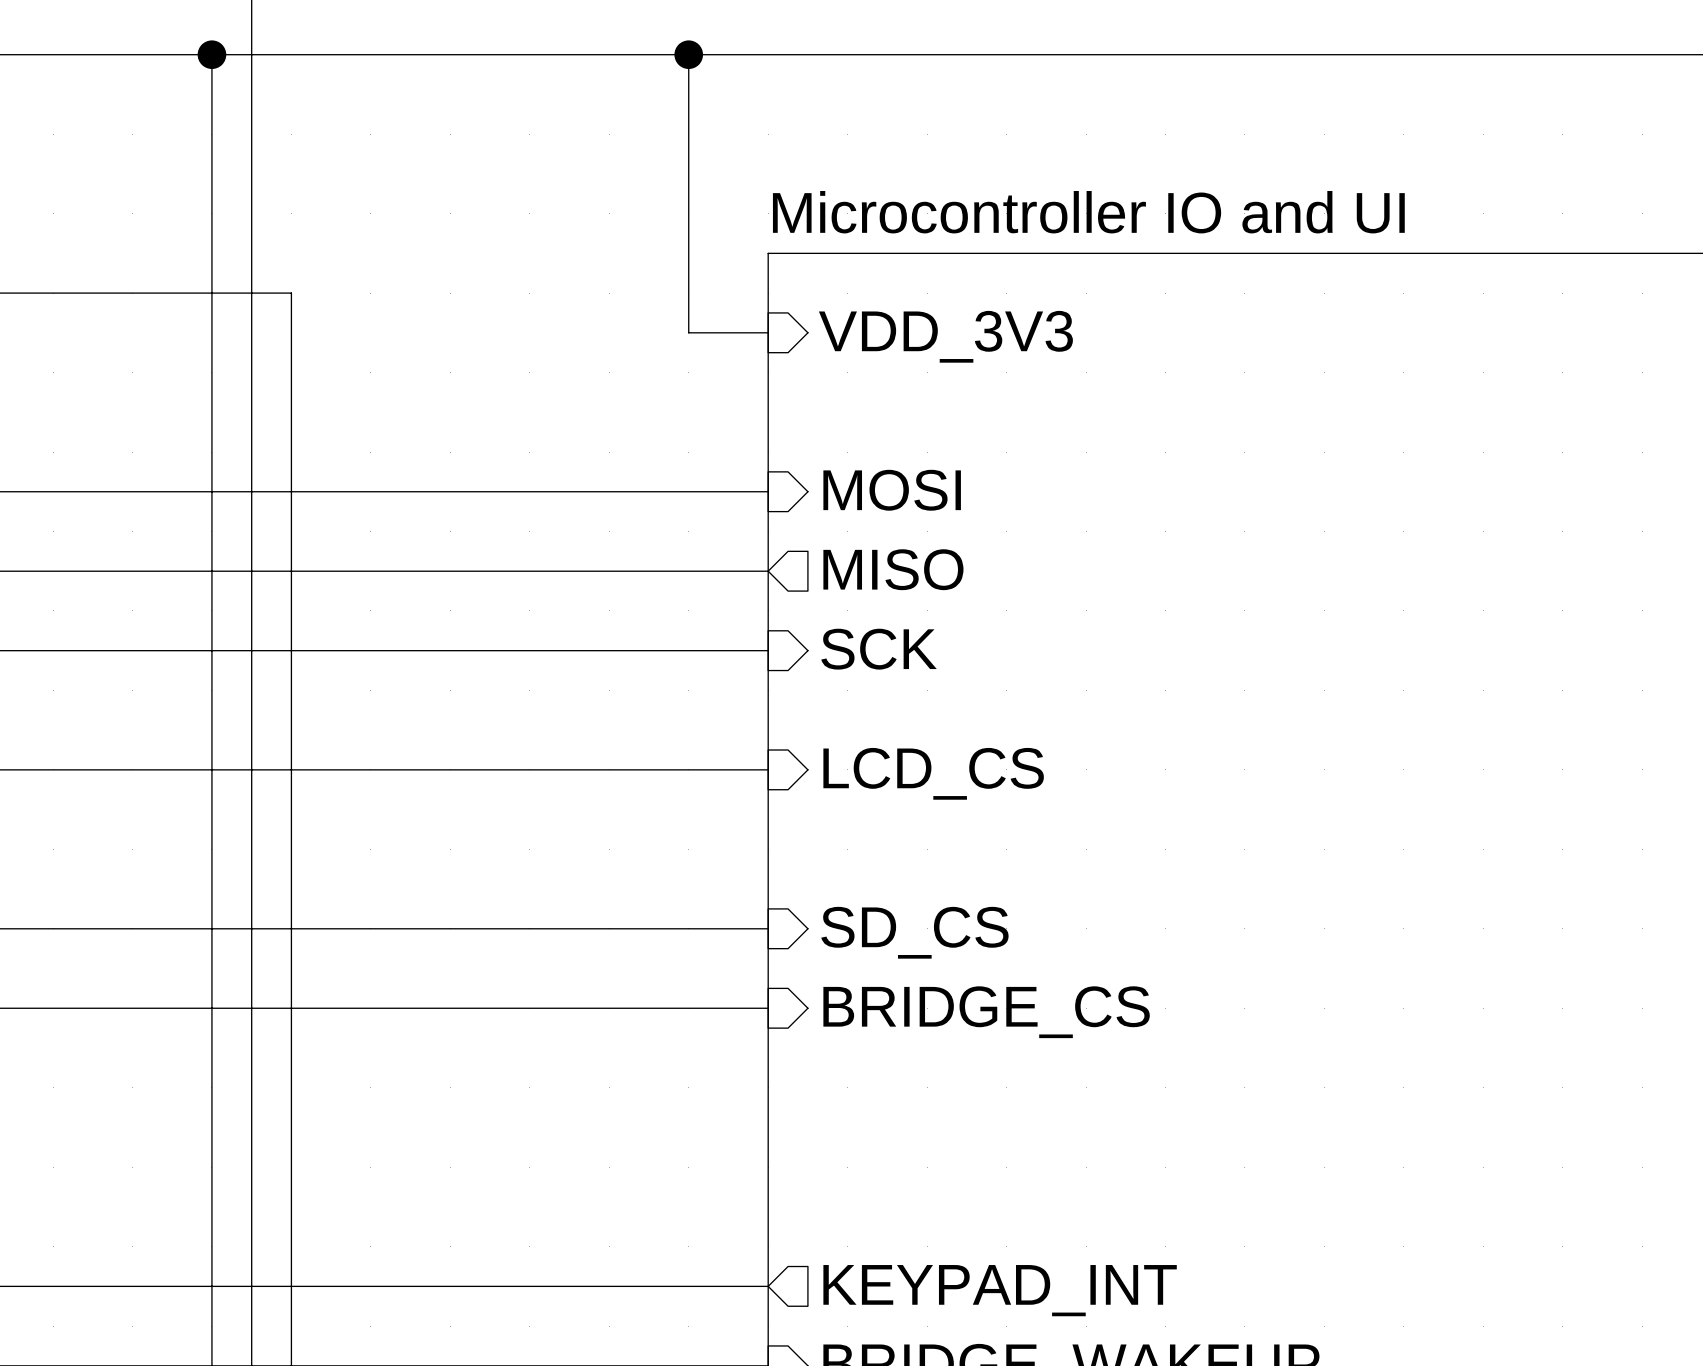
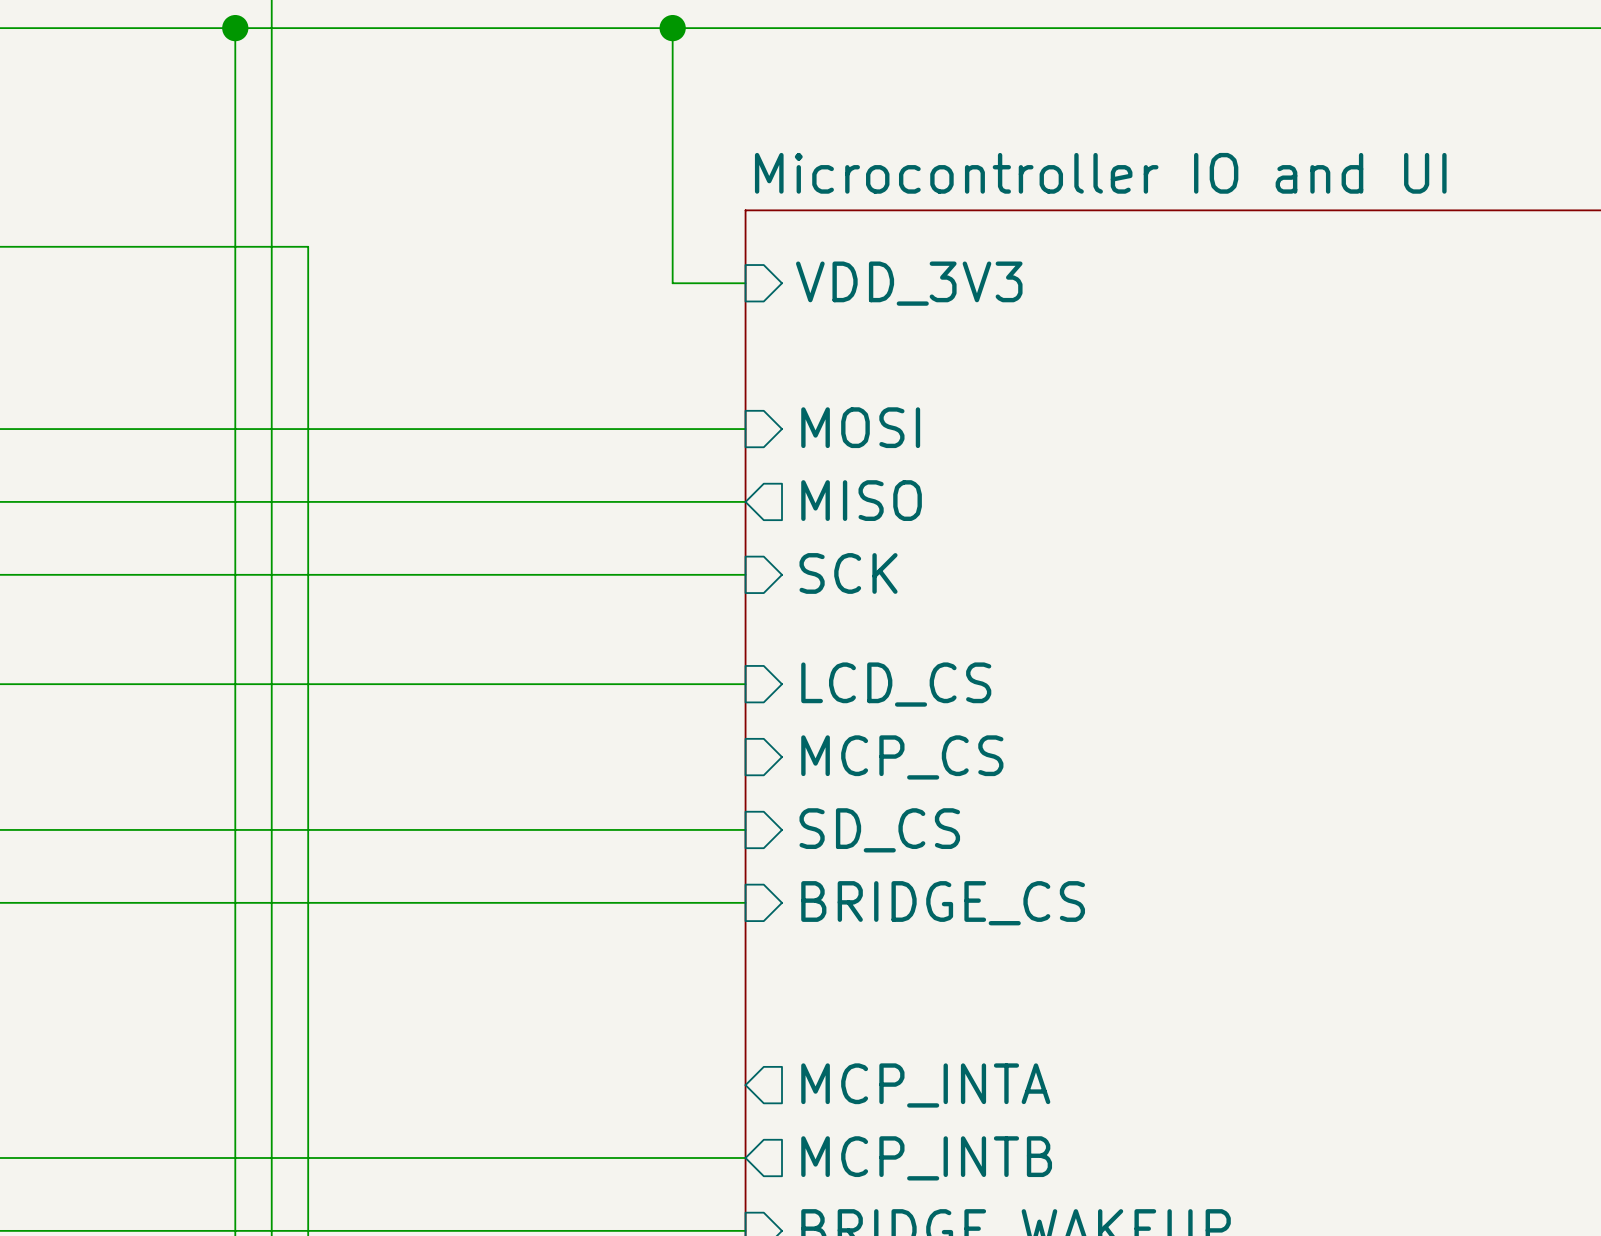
sheet pin: none -> MCP_CS (902, 757)
sheet pin: none -> MCP_INTA (925, 1085)
sheet pin: KEYPAD_INT (1000, 1290) -> MCP_INTB (926, 1158)

